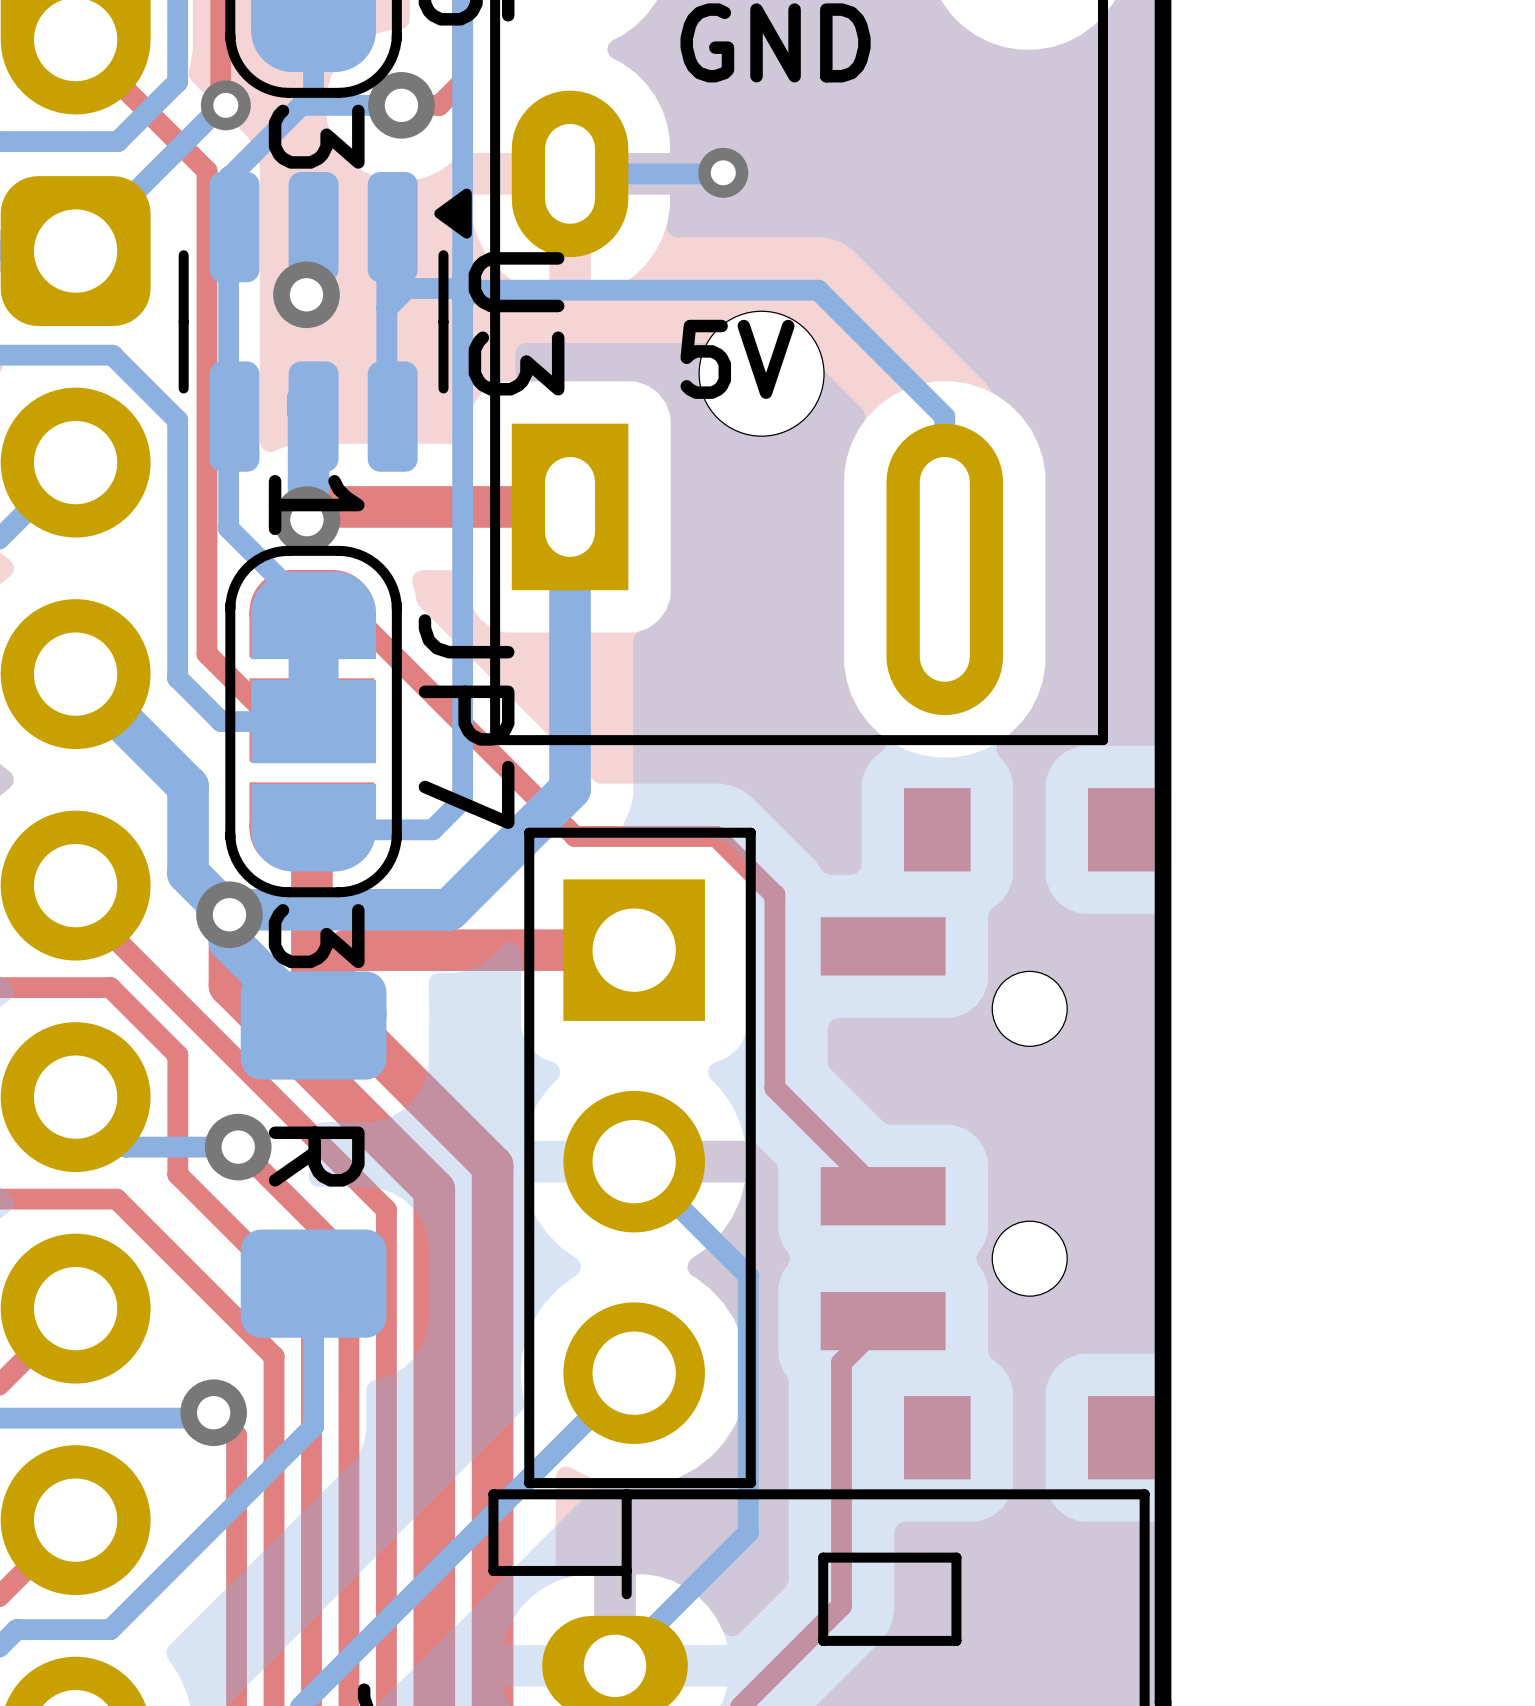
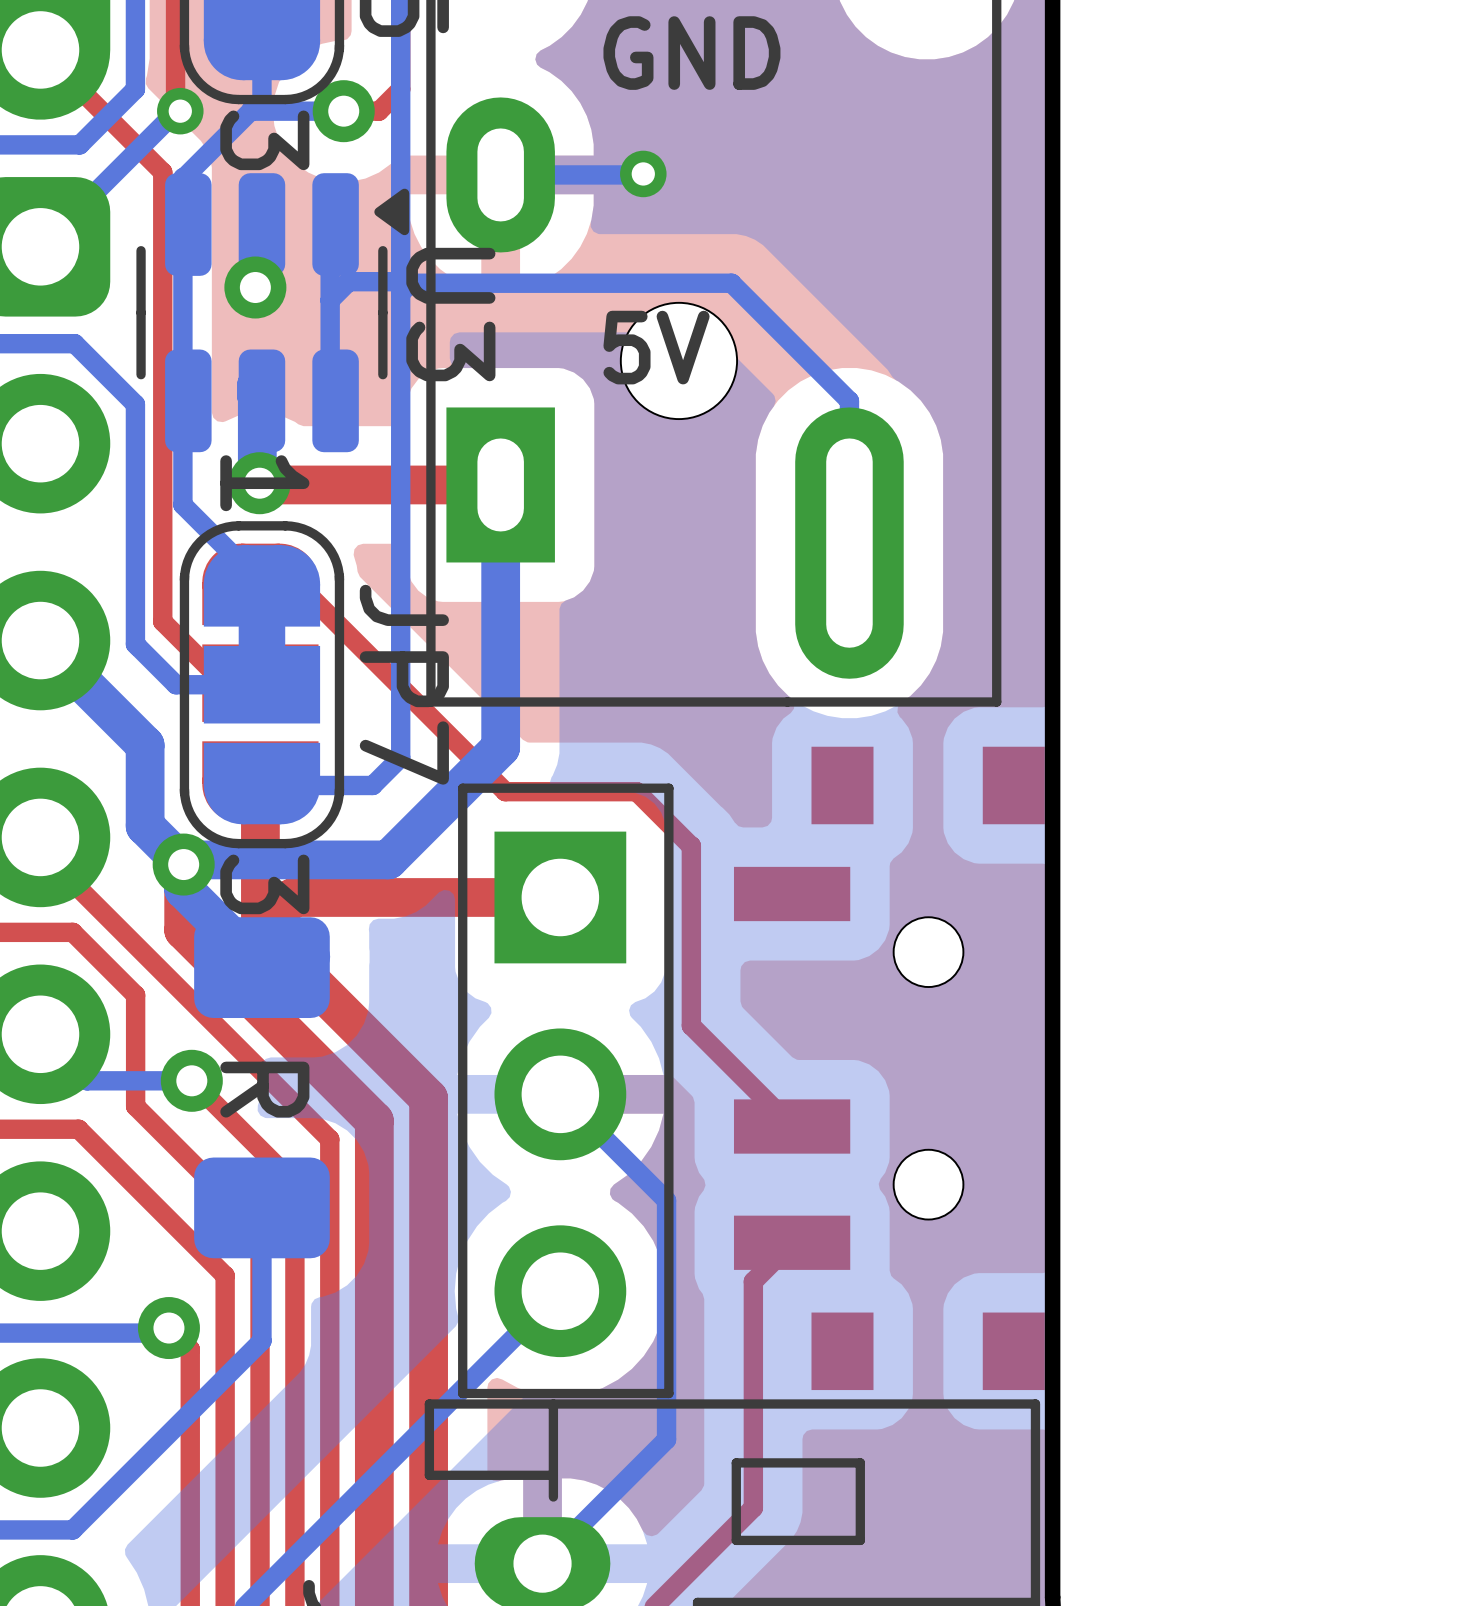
via position: (306, 519) -> (259, 483)

